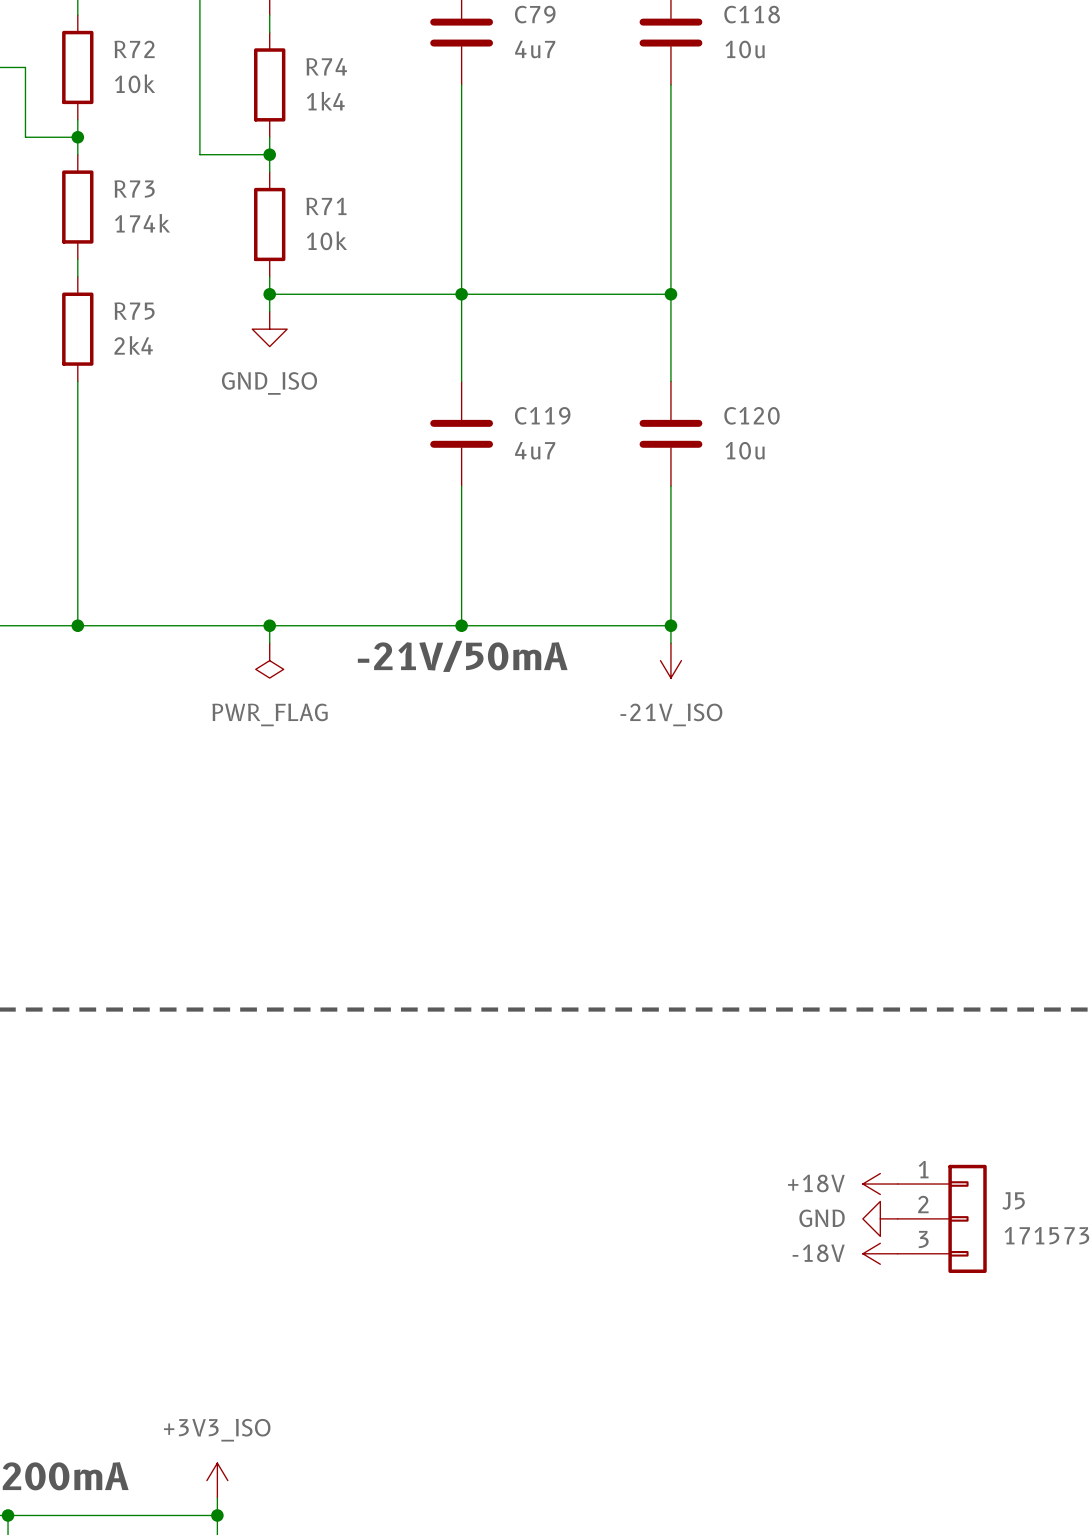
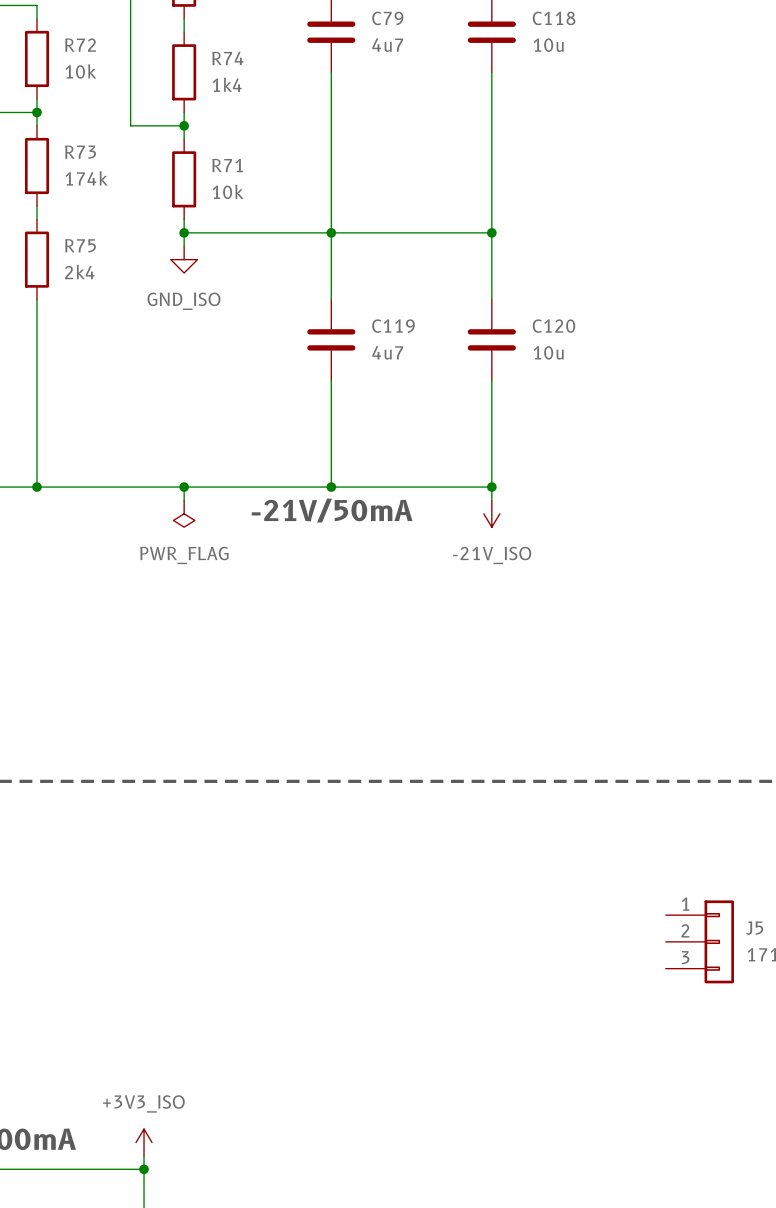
power symbol: +18V (880, 1184) -> none
power symbol: GND (880, 1218) -> none
power symbol: -18V (880, 1253) -> none

